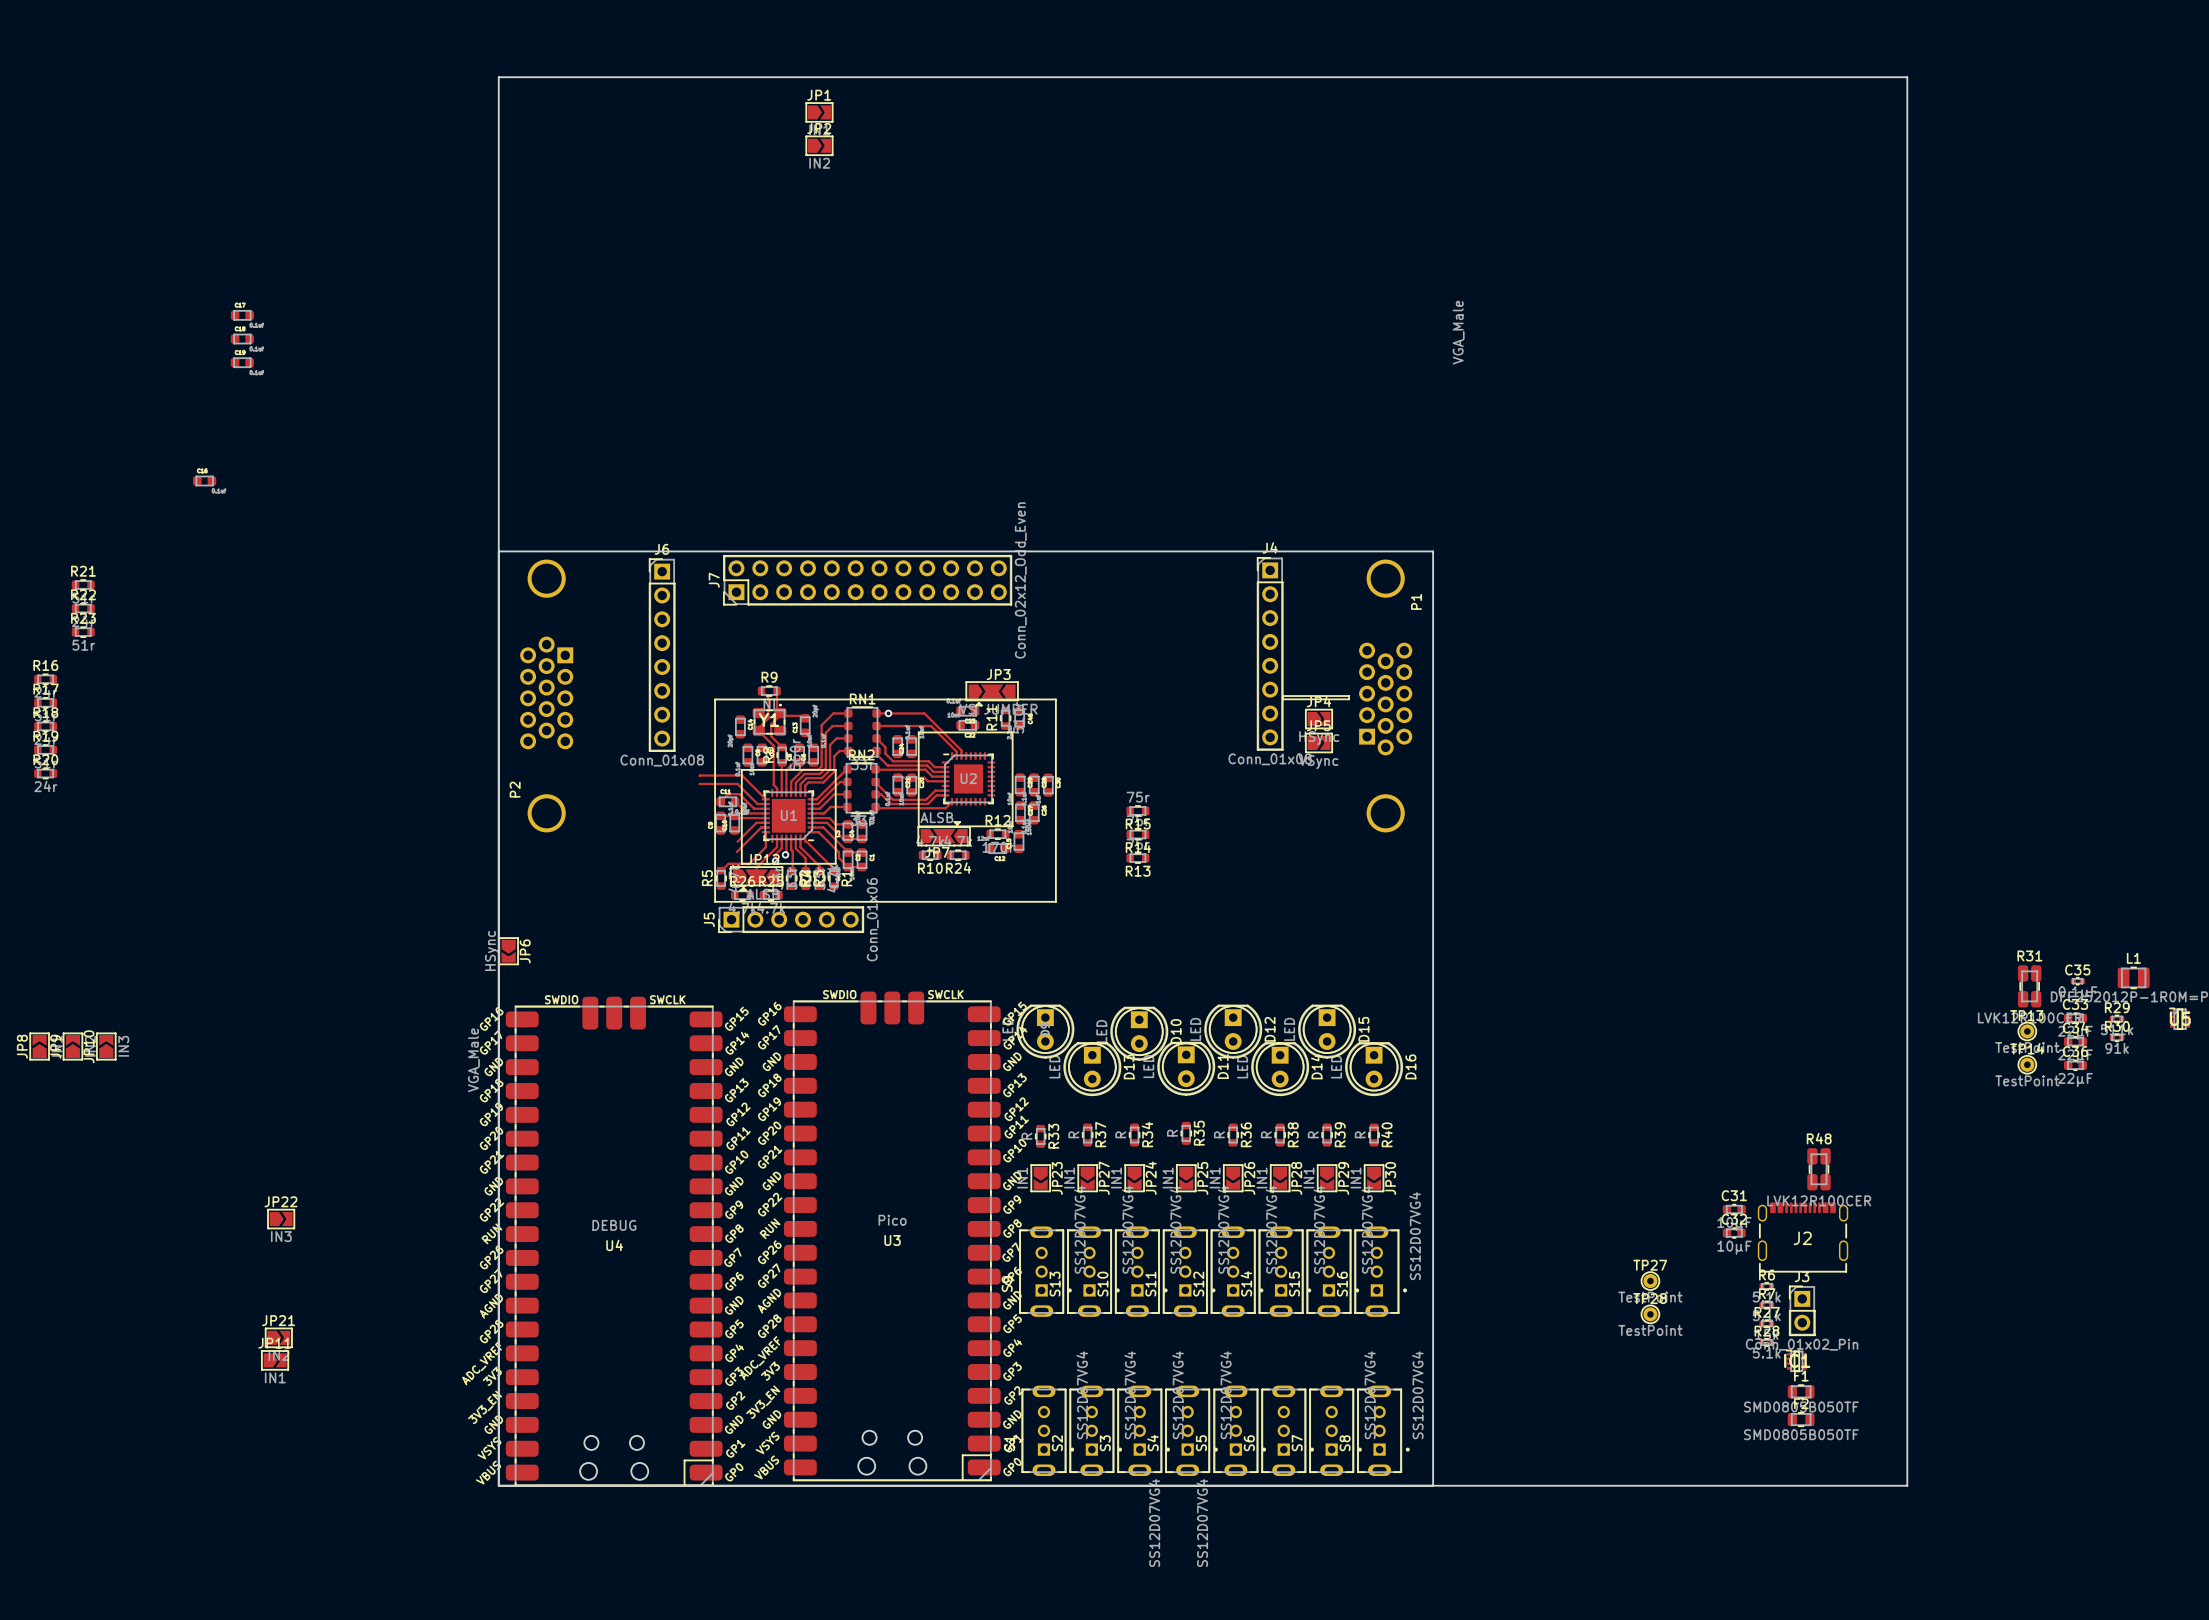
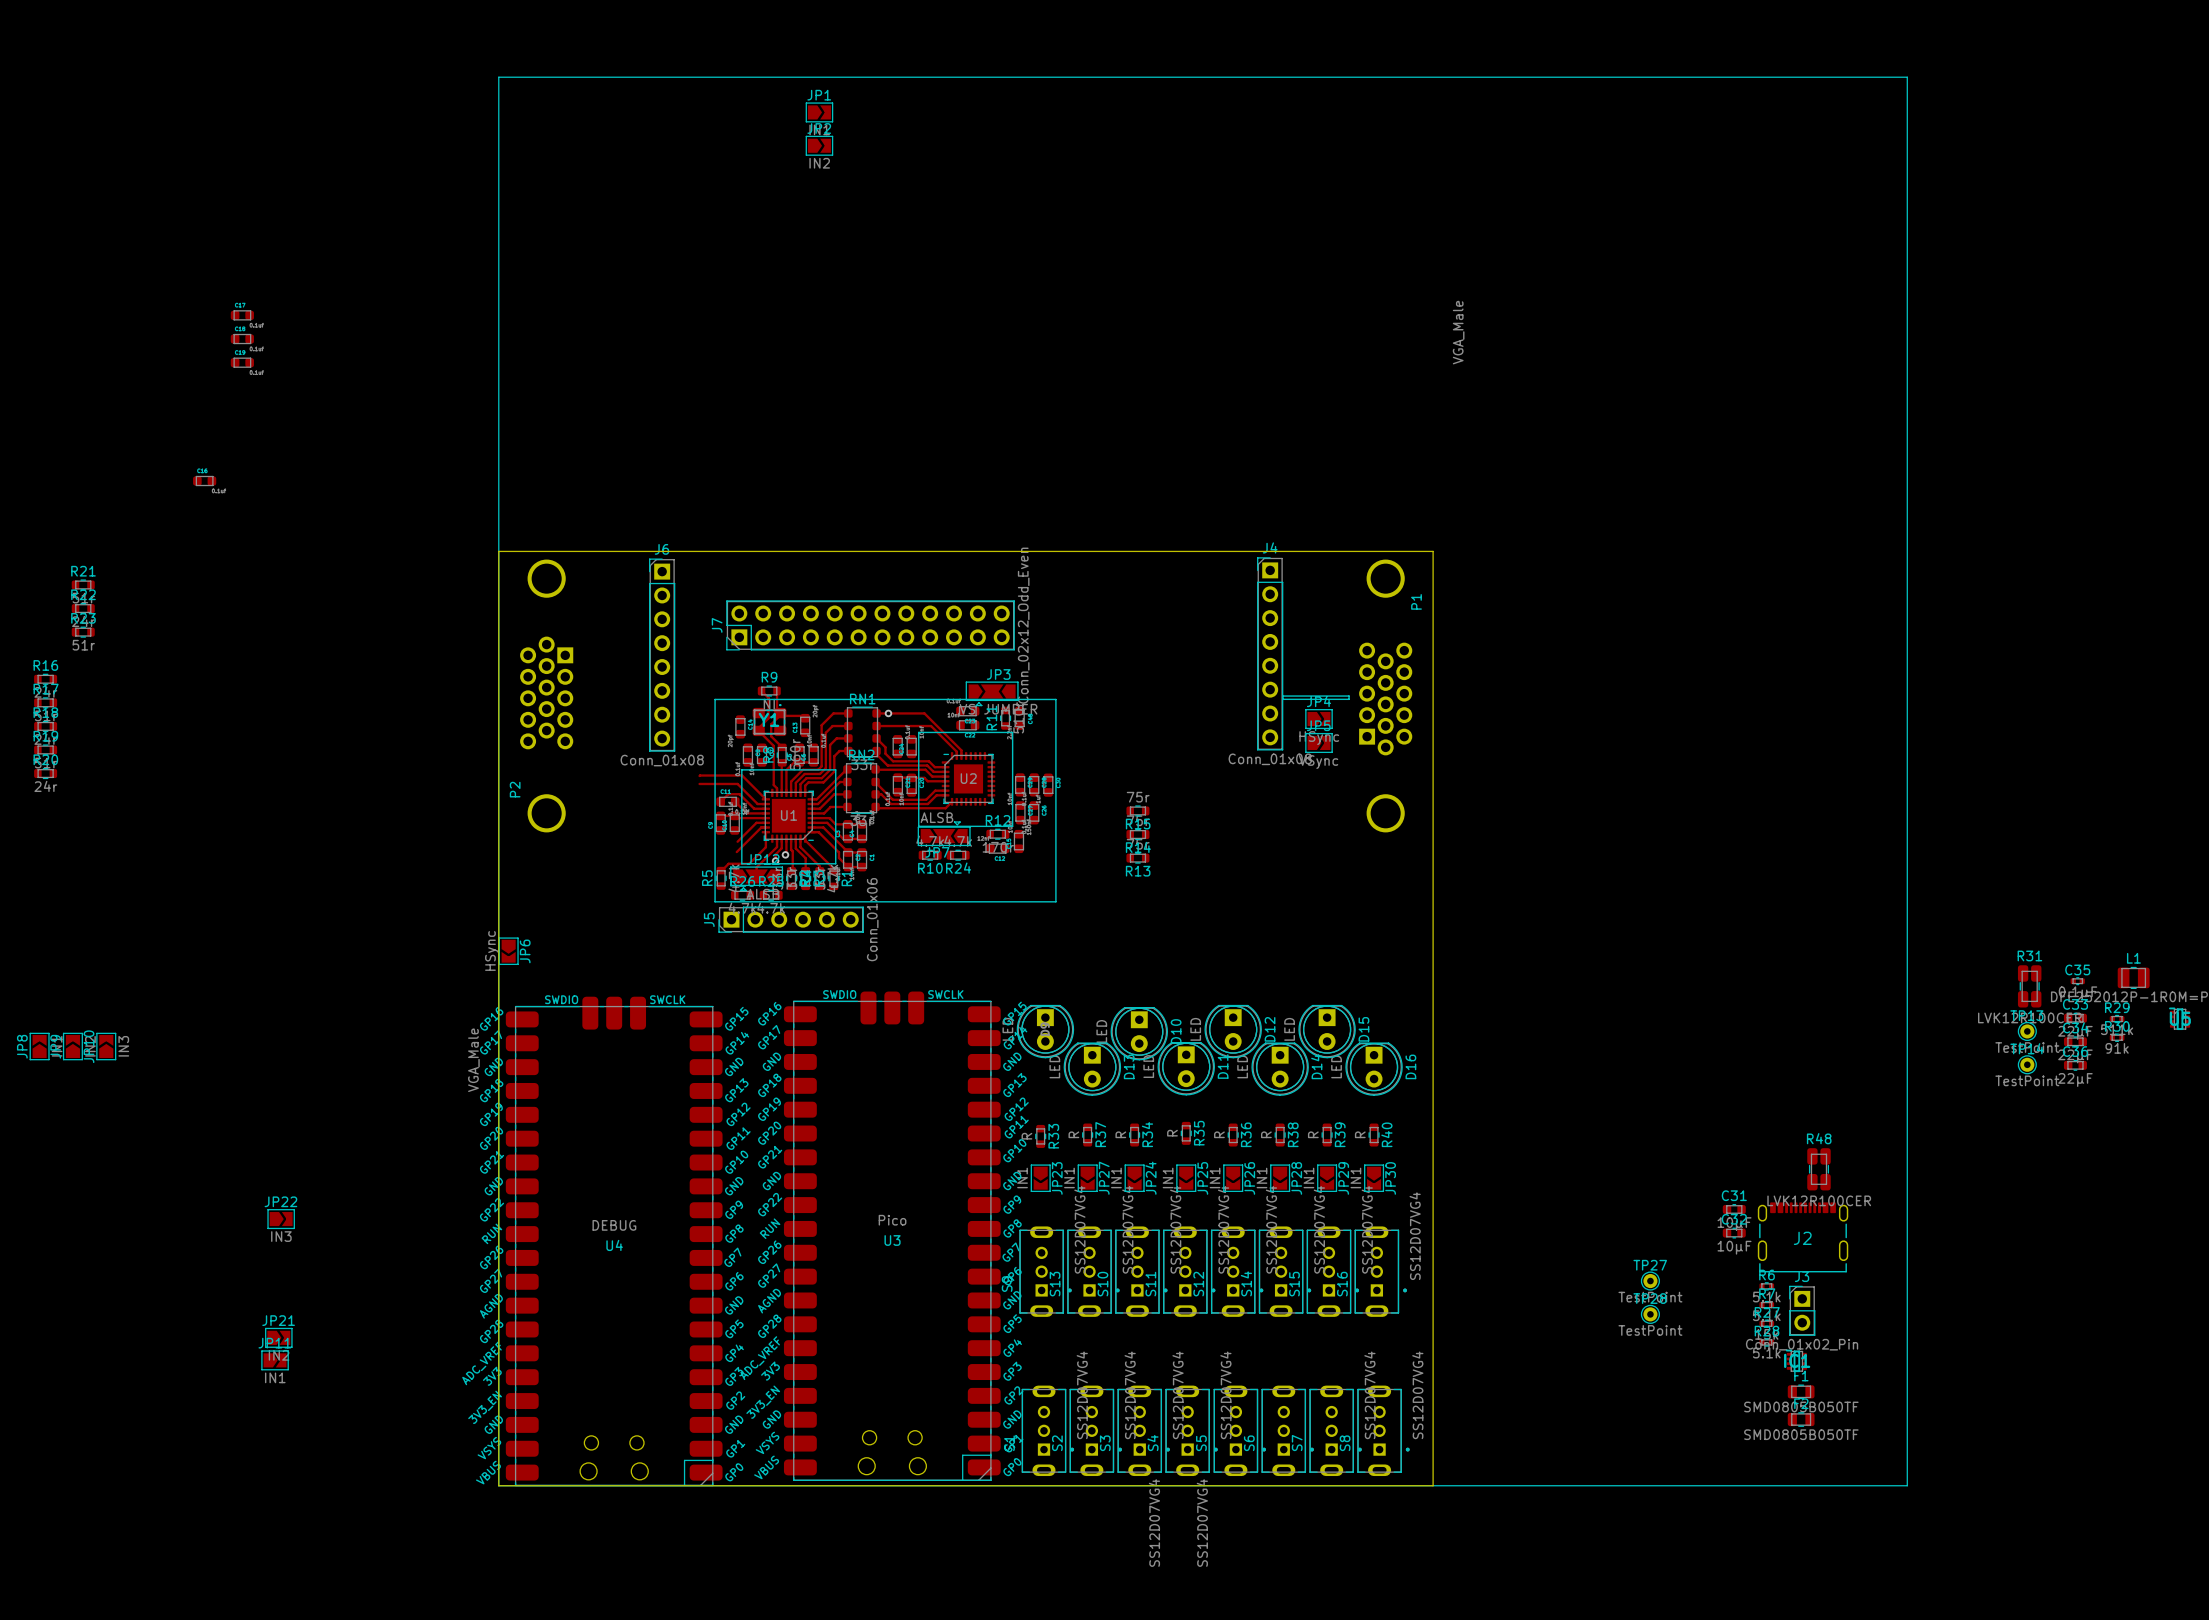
line: none -> (498, 77) (1907, 77) (1907, 1485) (498, 1485) (498, 77)
board edge: (498, 551) (498, 77) (1907, 77) (1907, 1485) (1433, 1485) -> none
J7 position: (867, 580) -> (870, 625)

